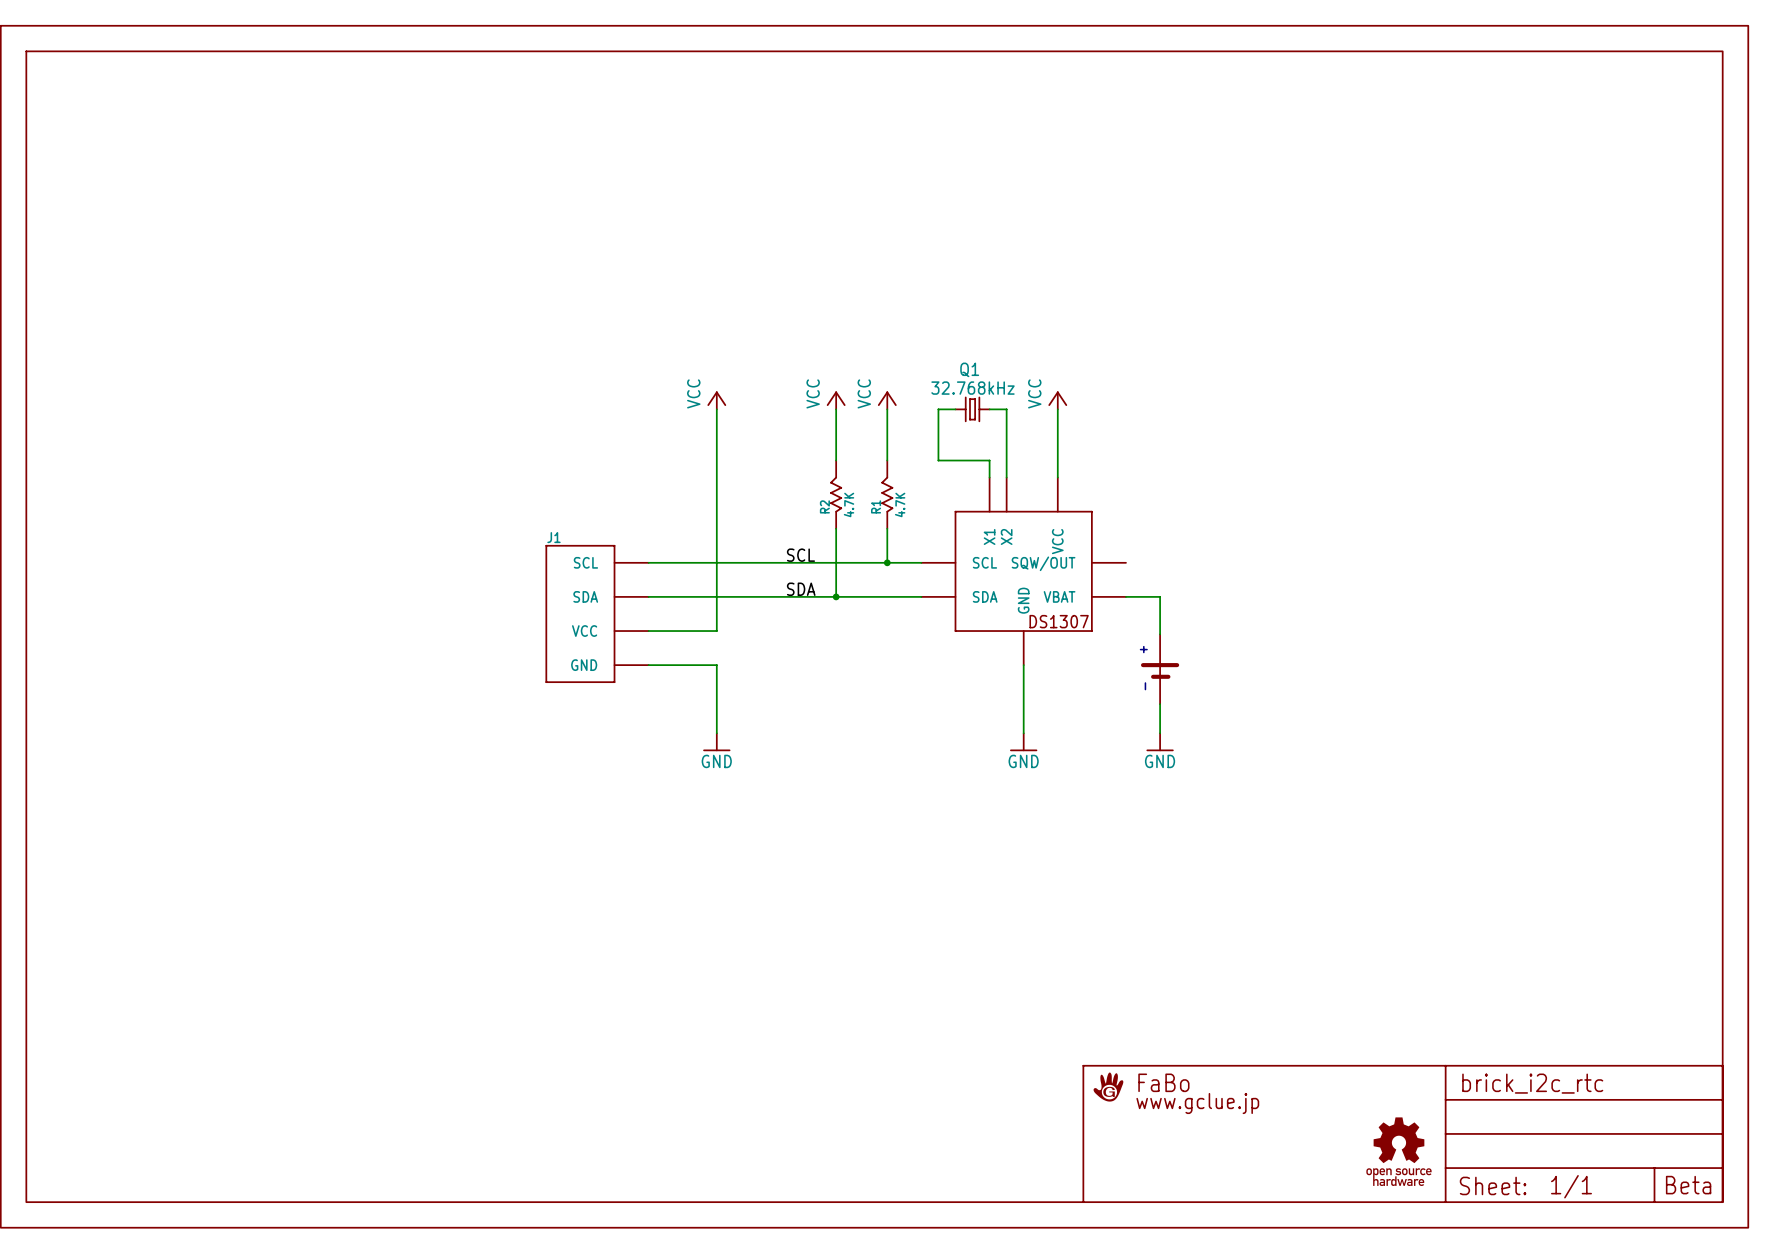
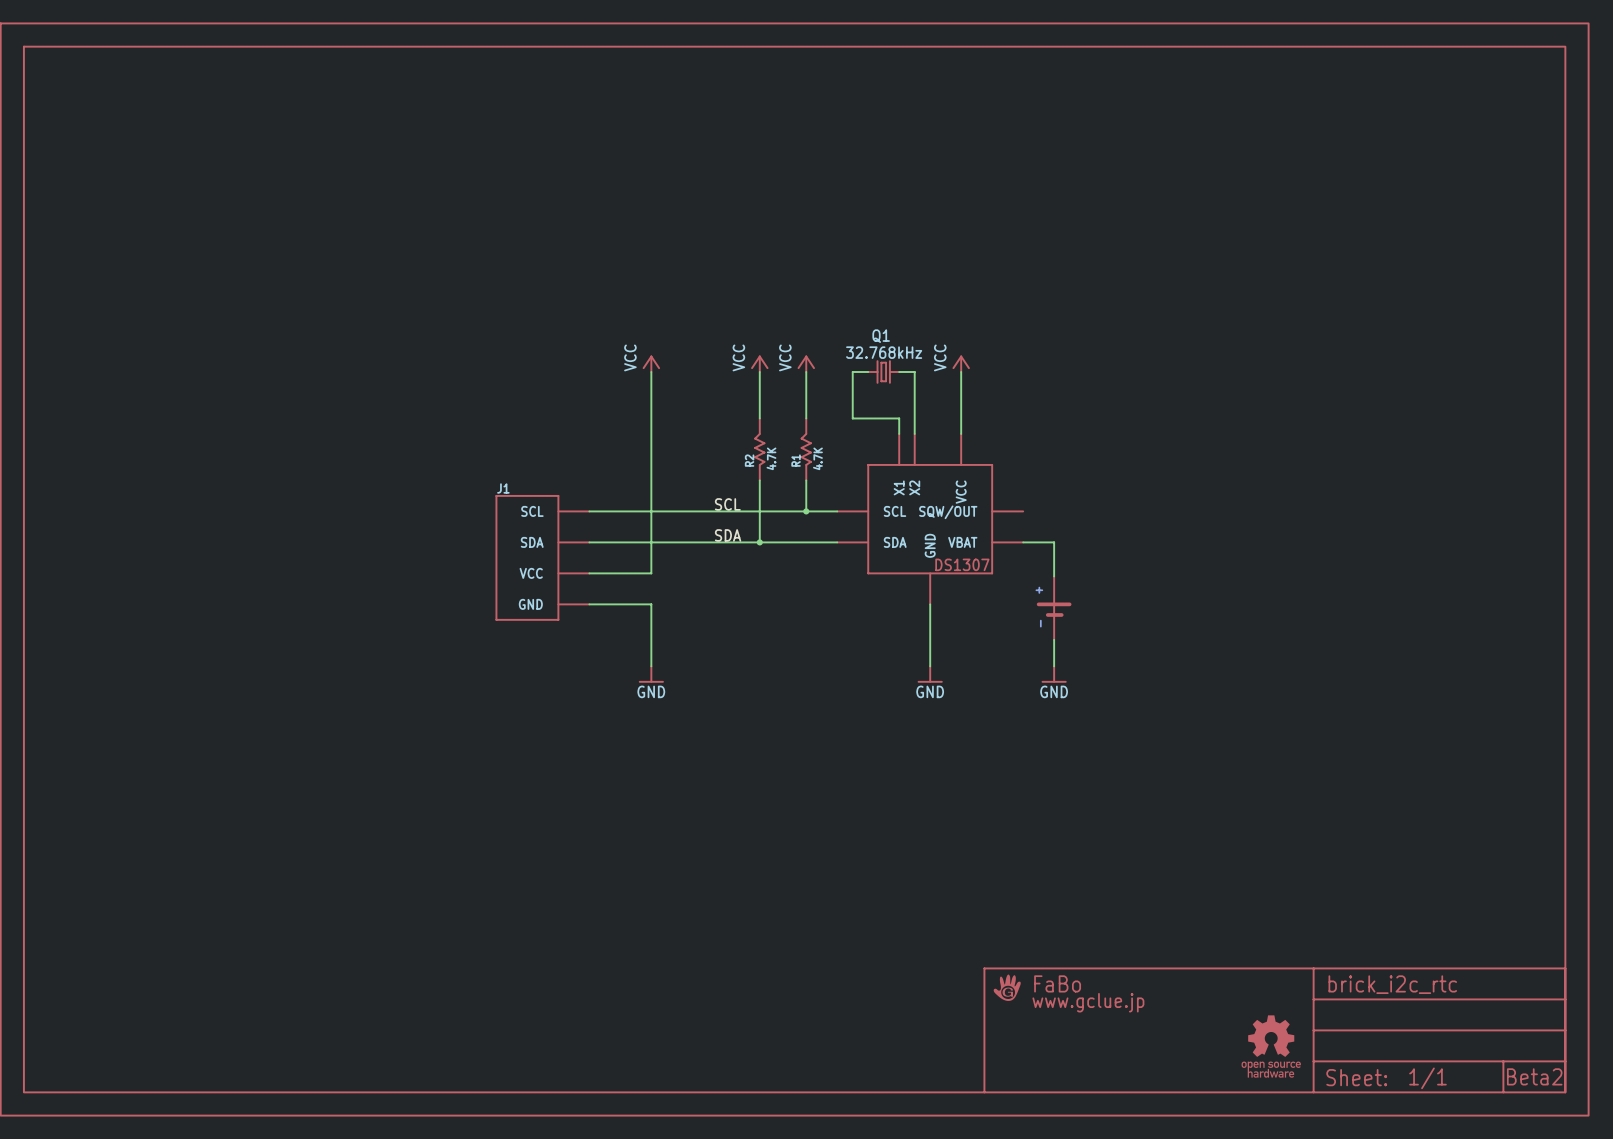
text: Beta (1688, 1185) -> Beta2 (1534, 1076)

